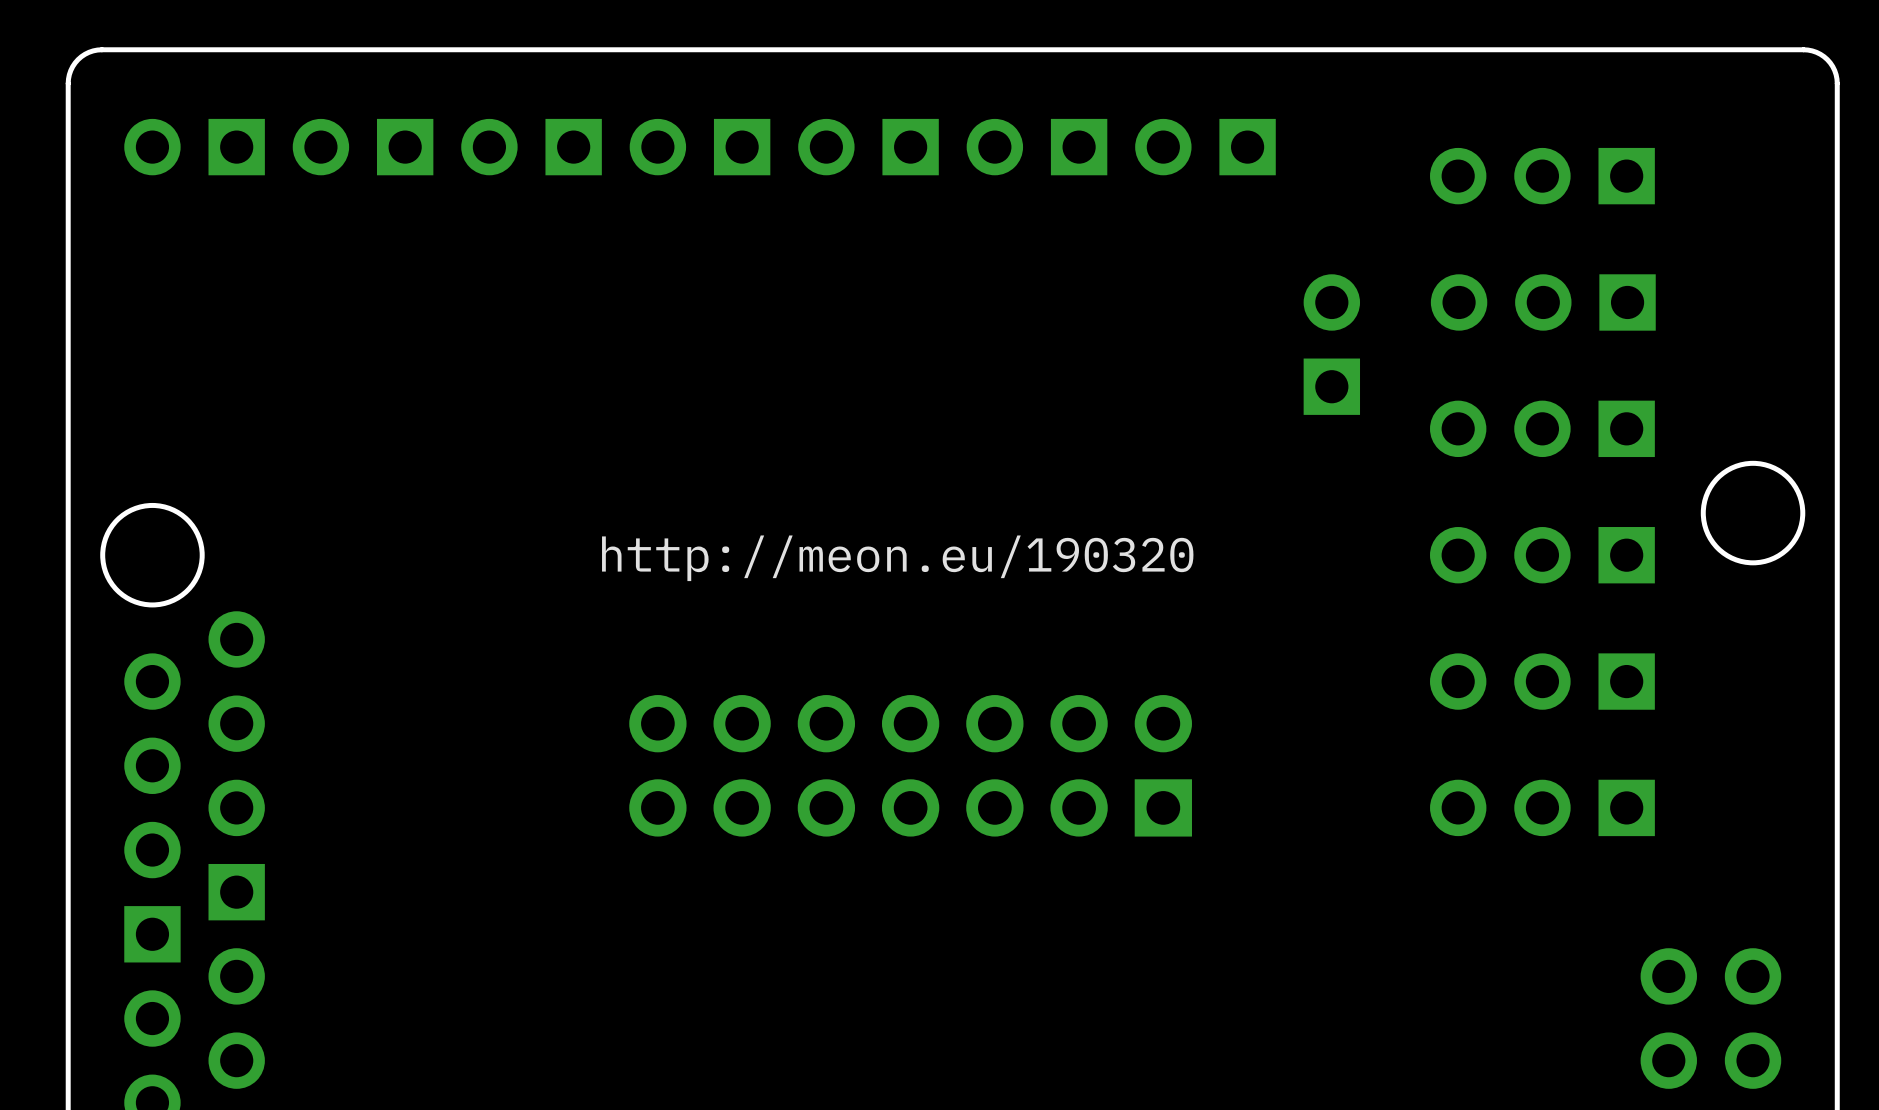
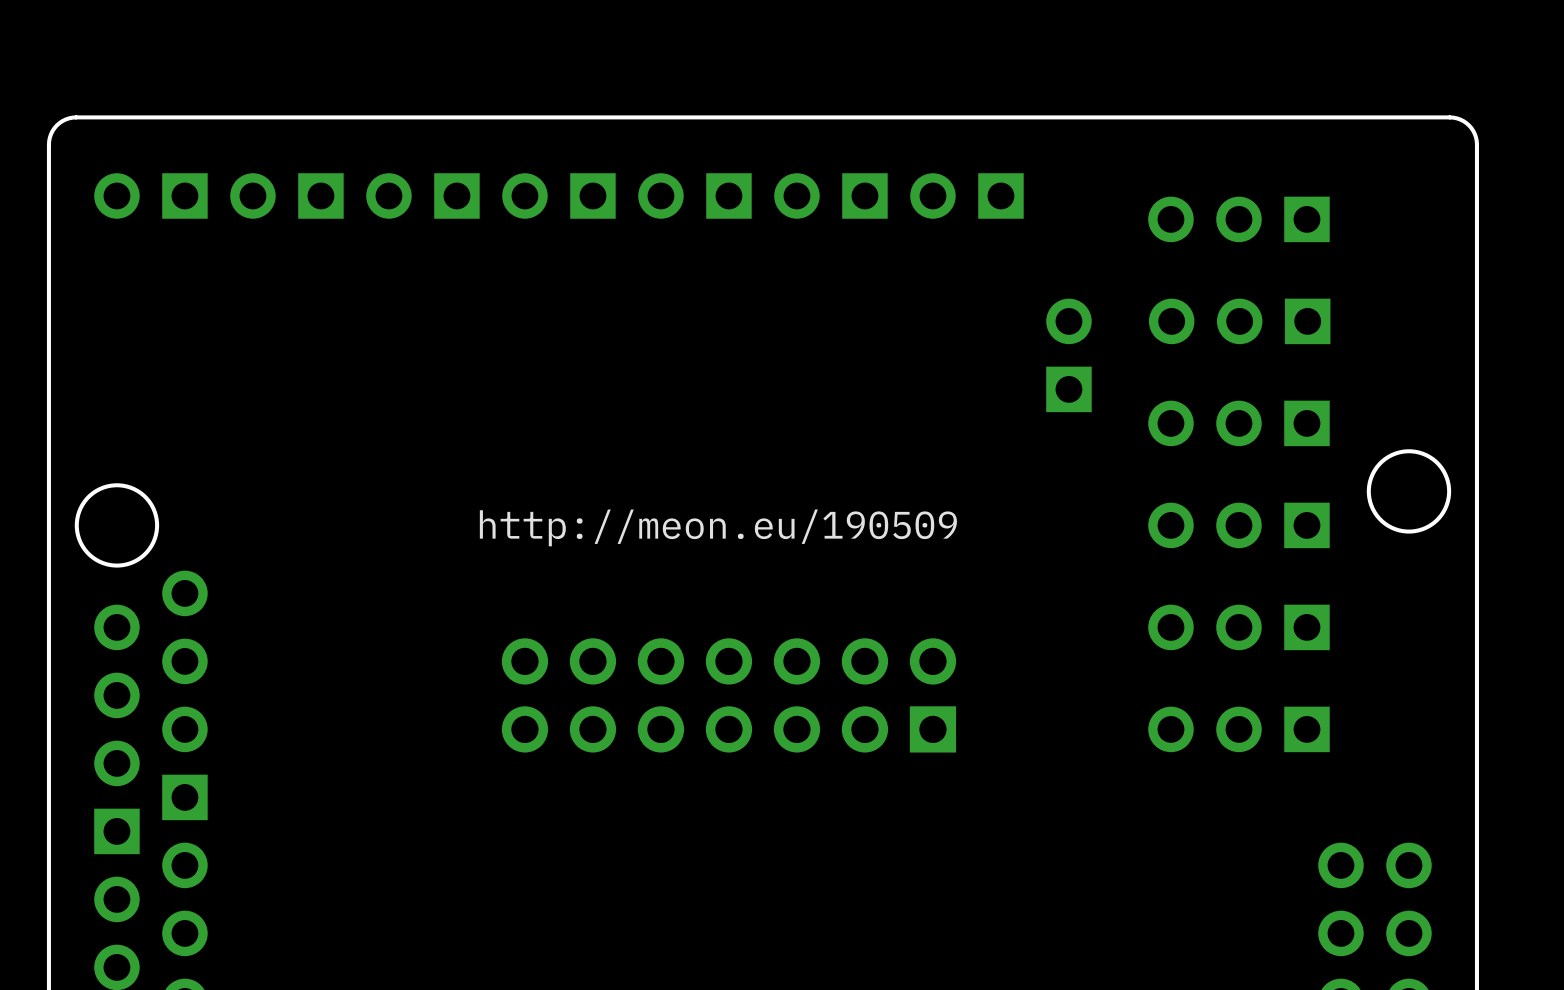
text: http://meon.eu/190320 (897, 558) -> http://meon.eu/190509 (718, 527)

